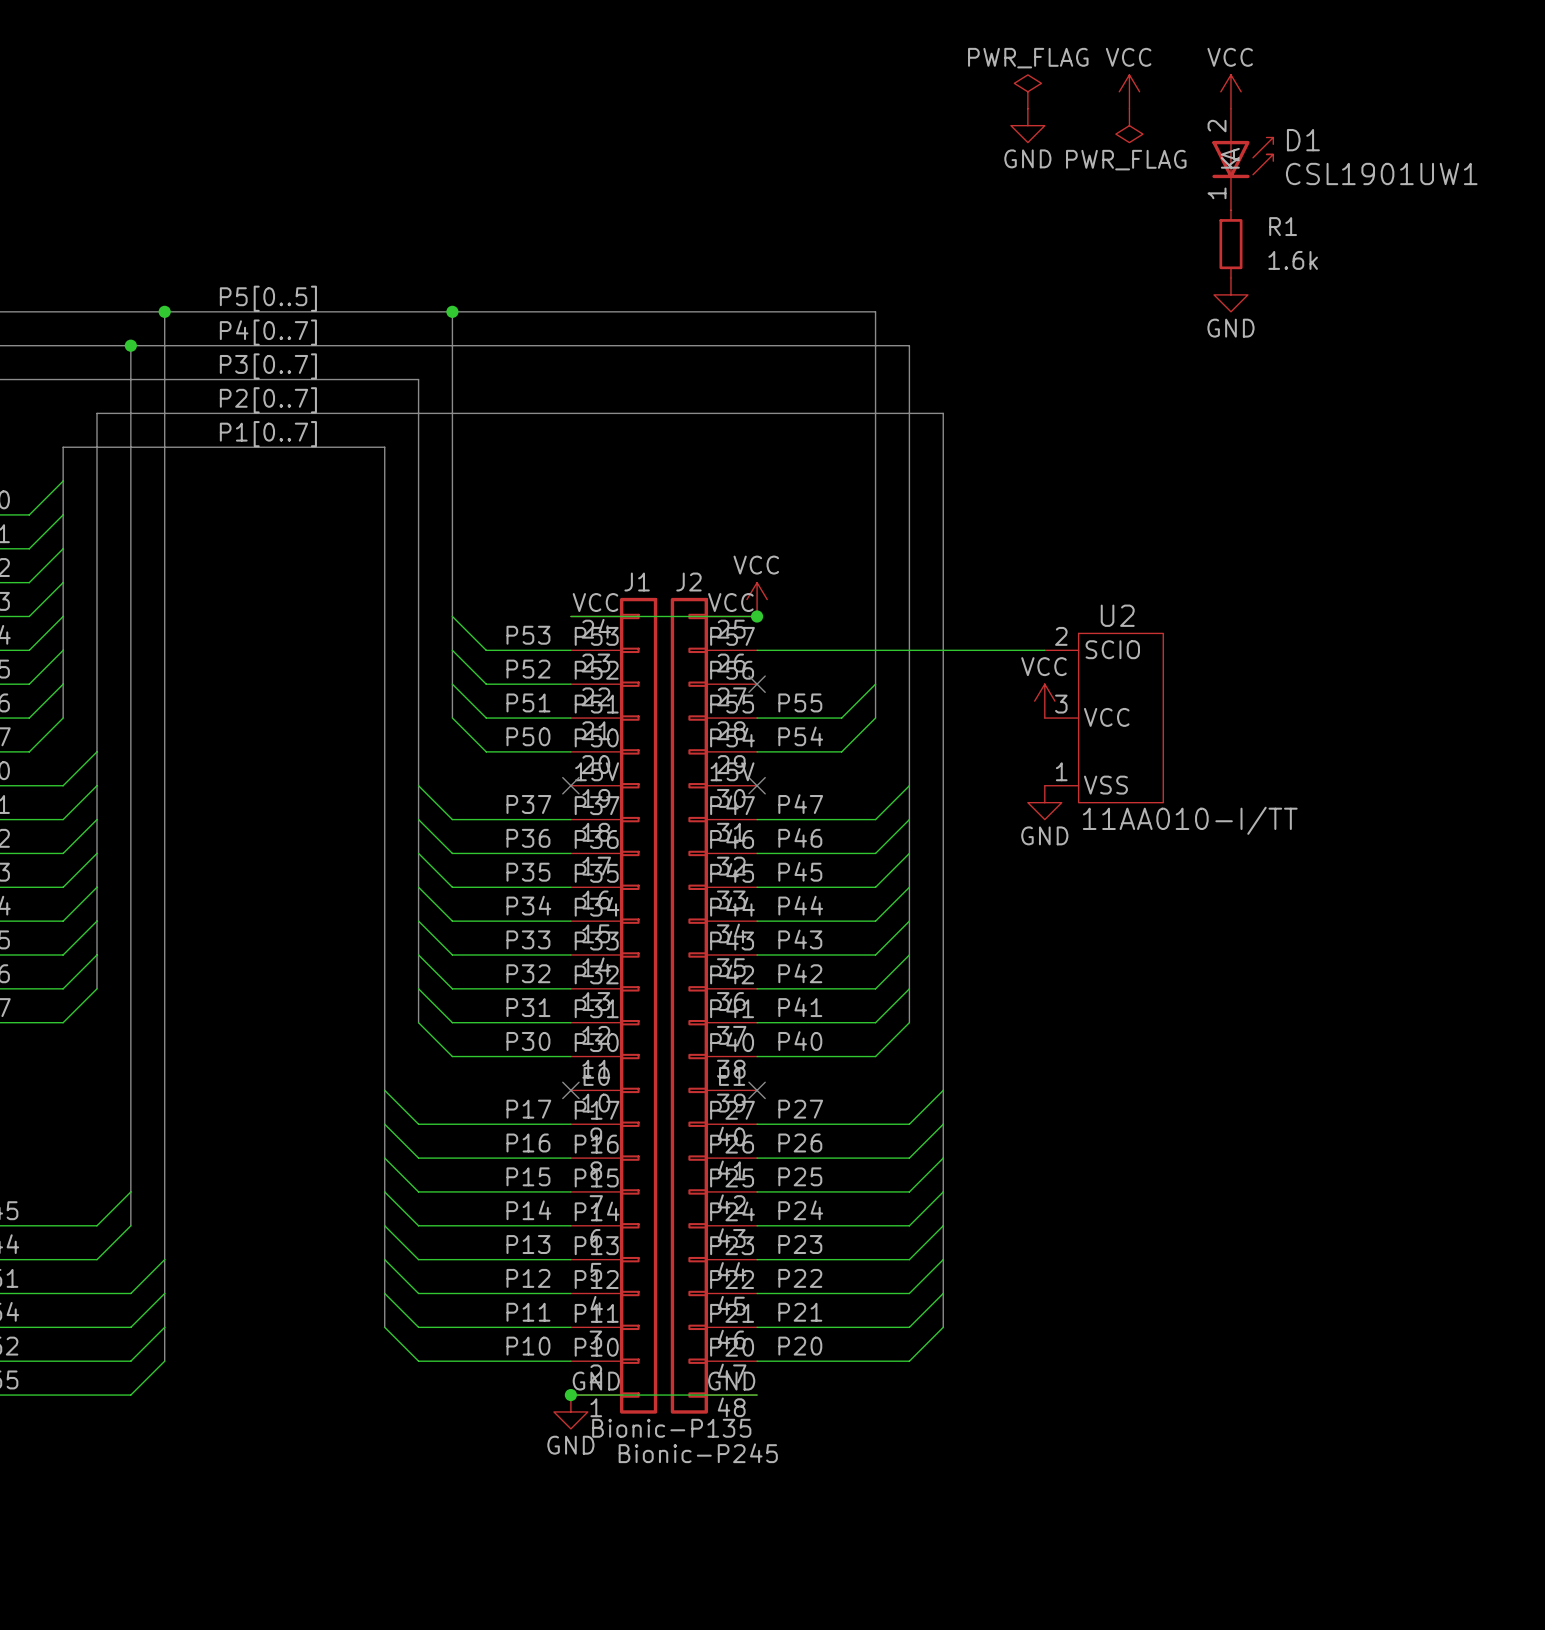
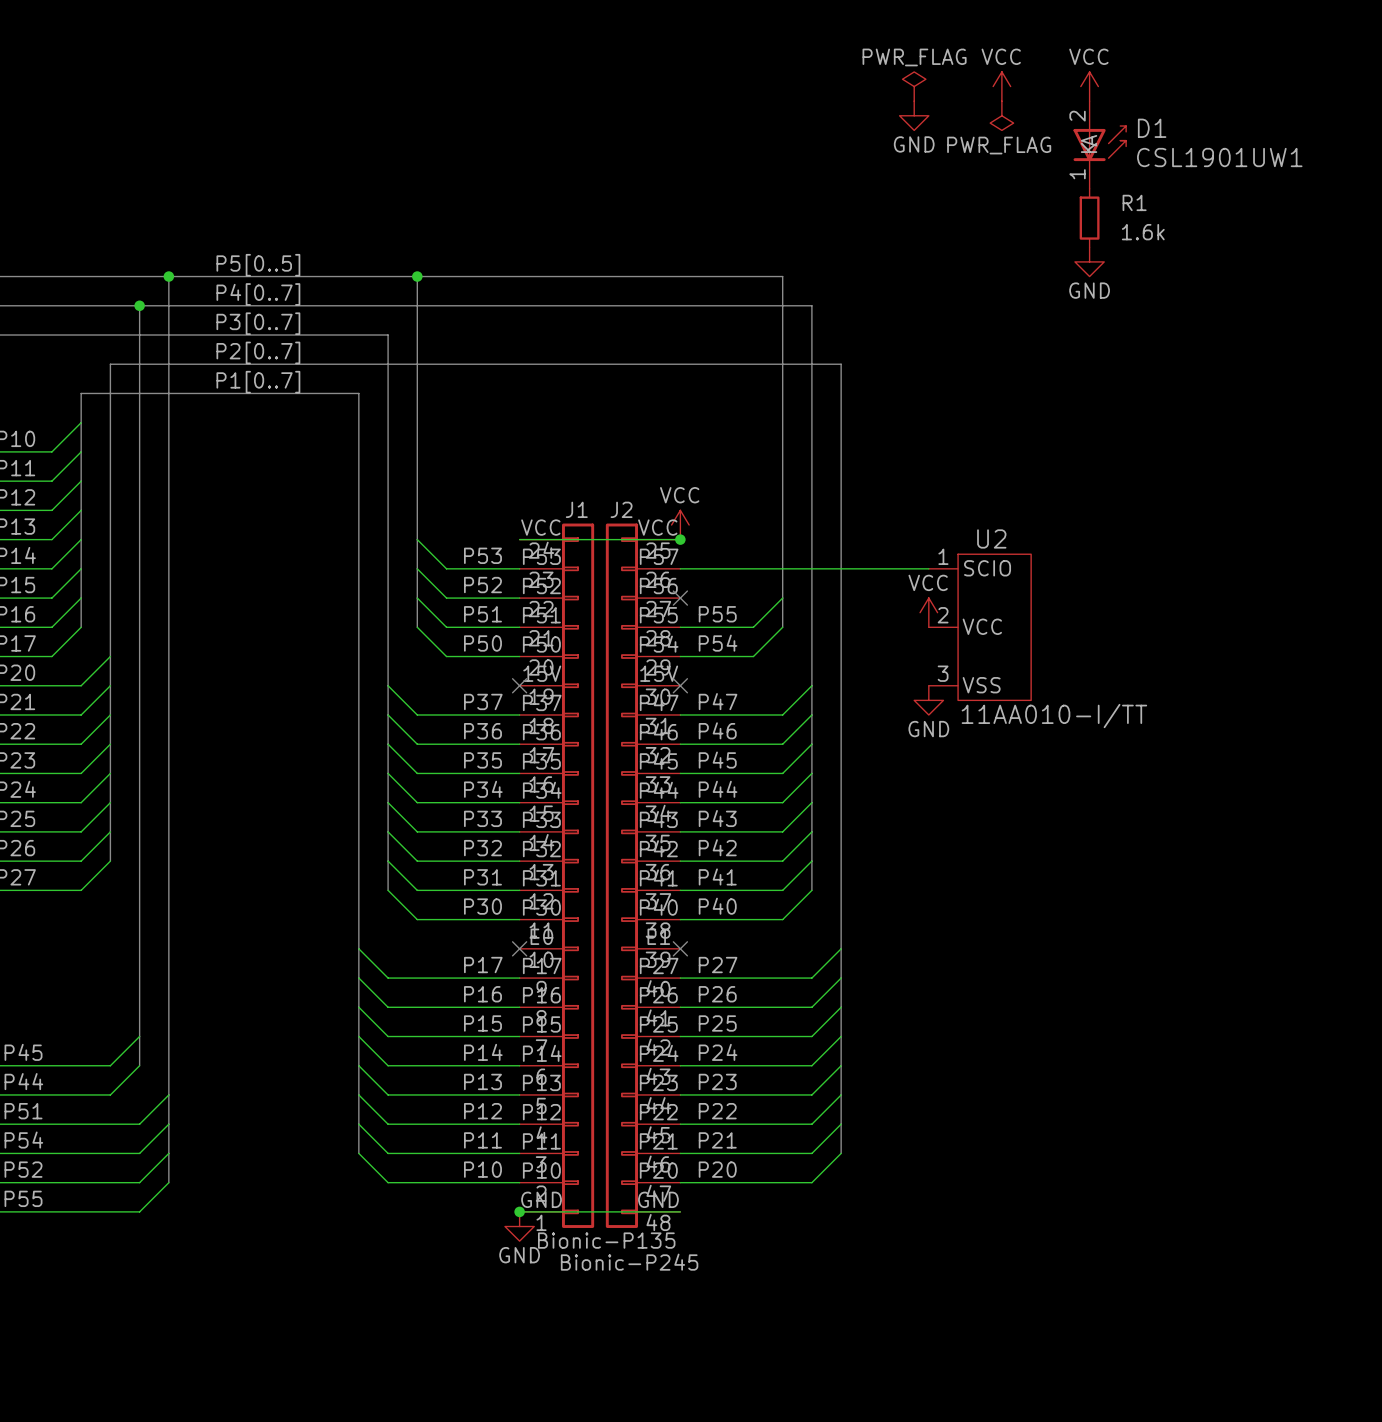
U2 pin number: 2 (1061, 636) -> 1 (943, 556)
U2 pin number: 3 (1061, 704) -> 2 (943, 615)
U2 pin number: 1 (1061, 771) -> 3 (943, 673)

